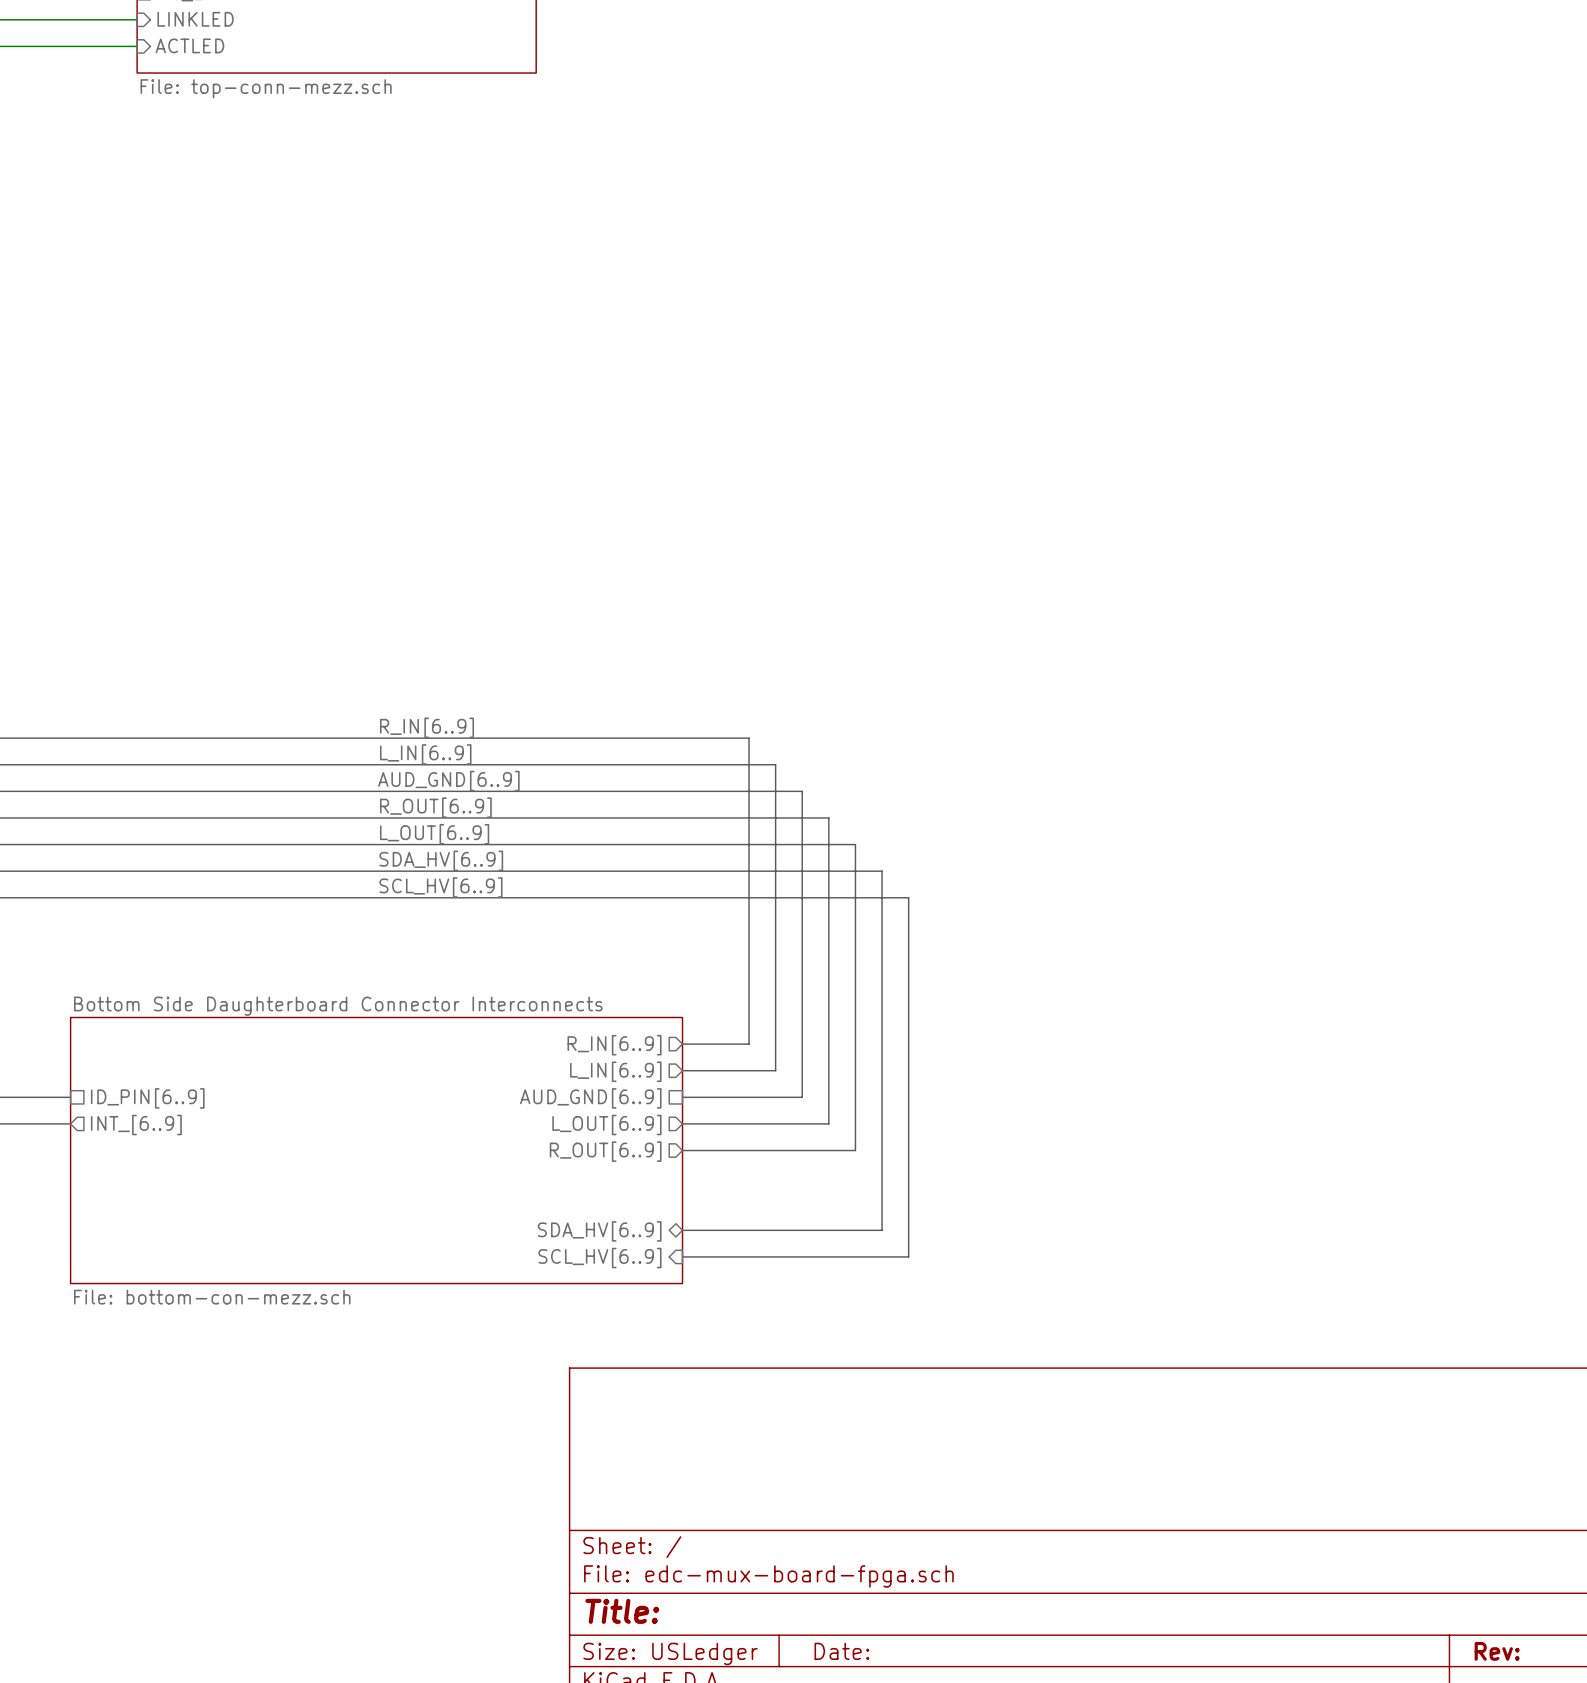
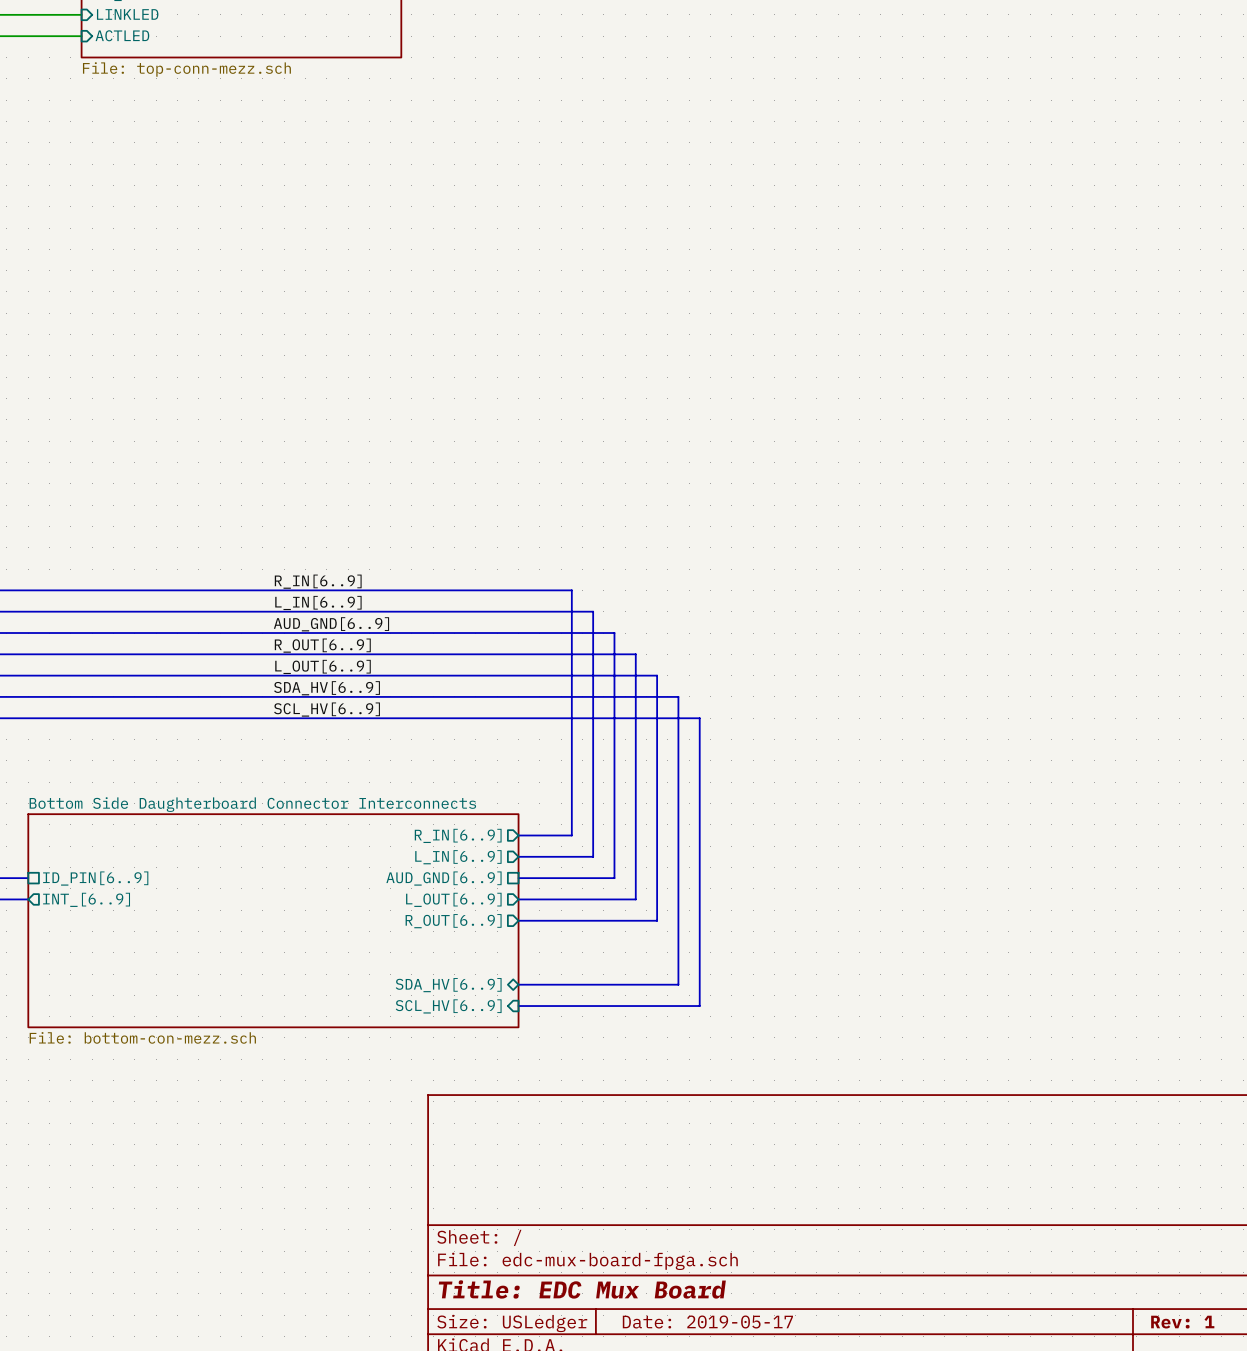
title block: Title: (622, 1611) -> Title: EDC Mux Board (582, 1289)
title block: Date: (841, 1651) -> Date: 2019-05-17 (707, 1322)
title block: Rev: (1497, 1651) -> Rev: 1 (1182, 1322)

